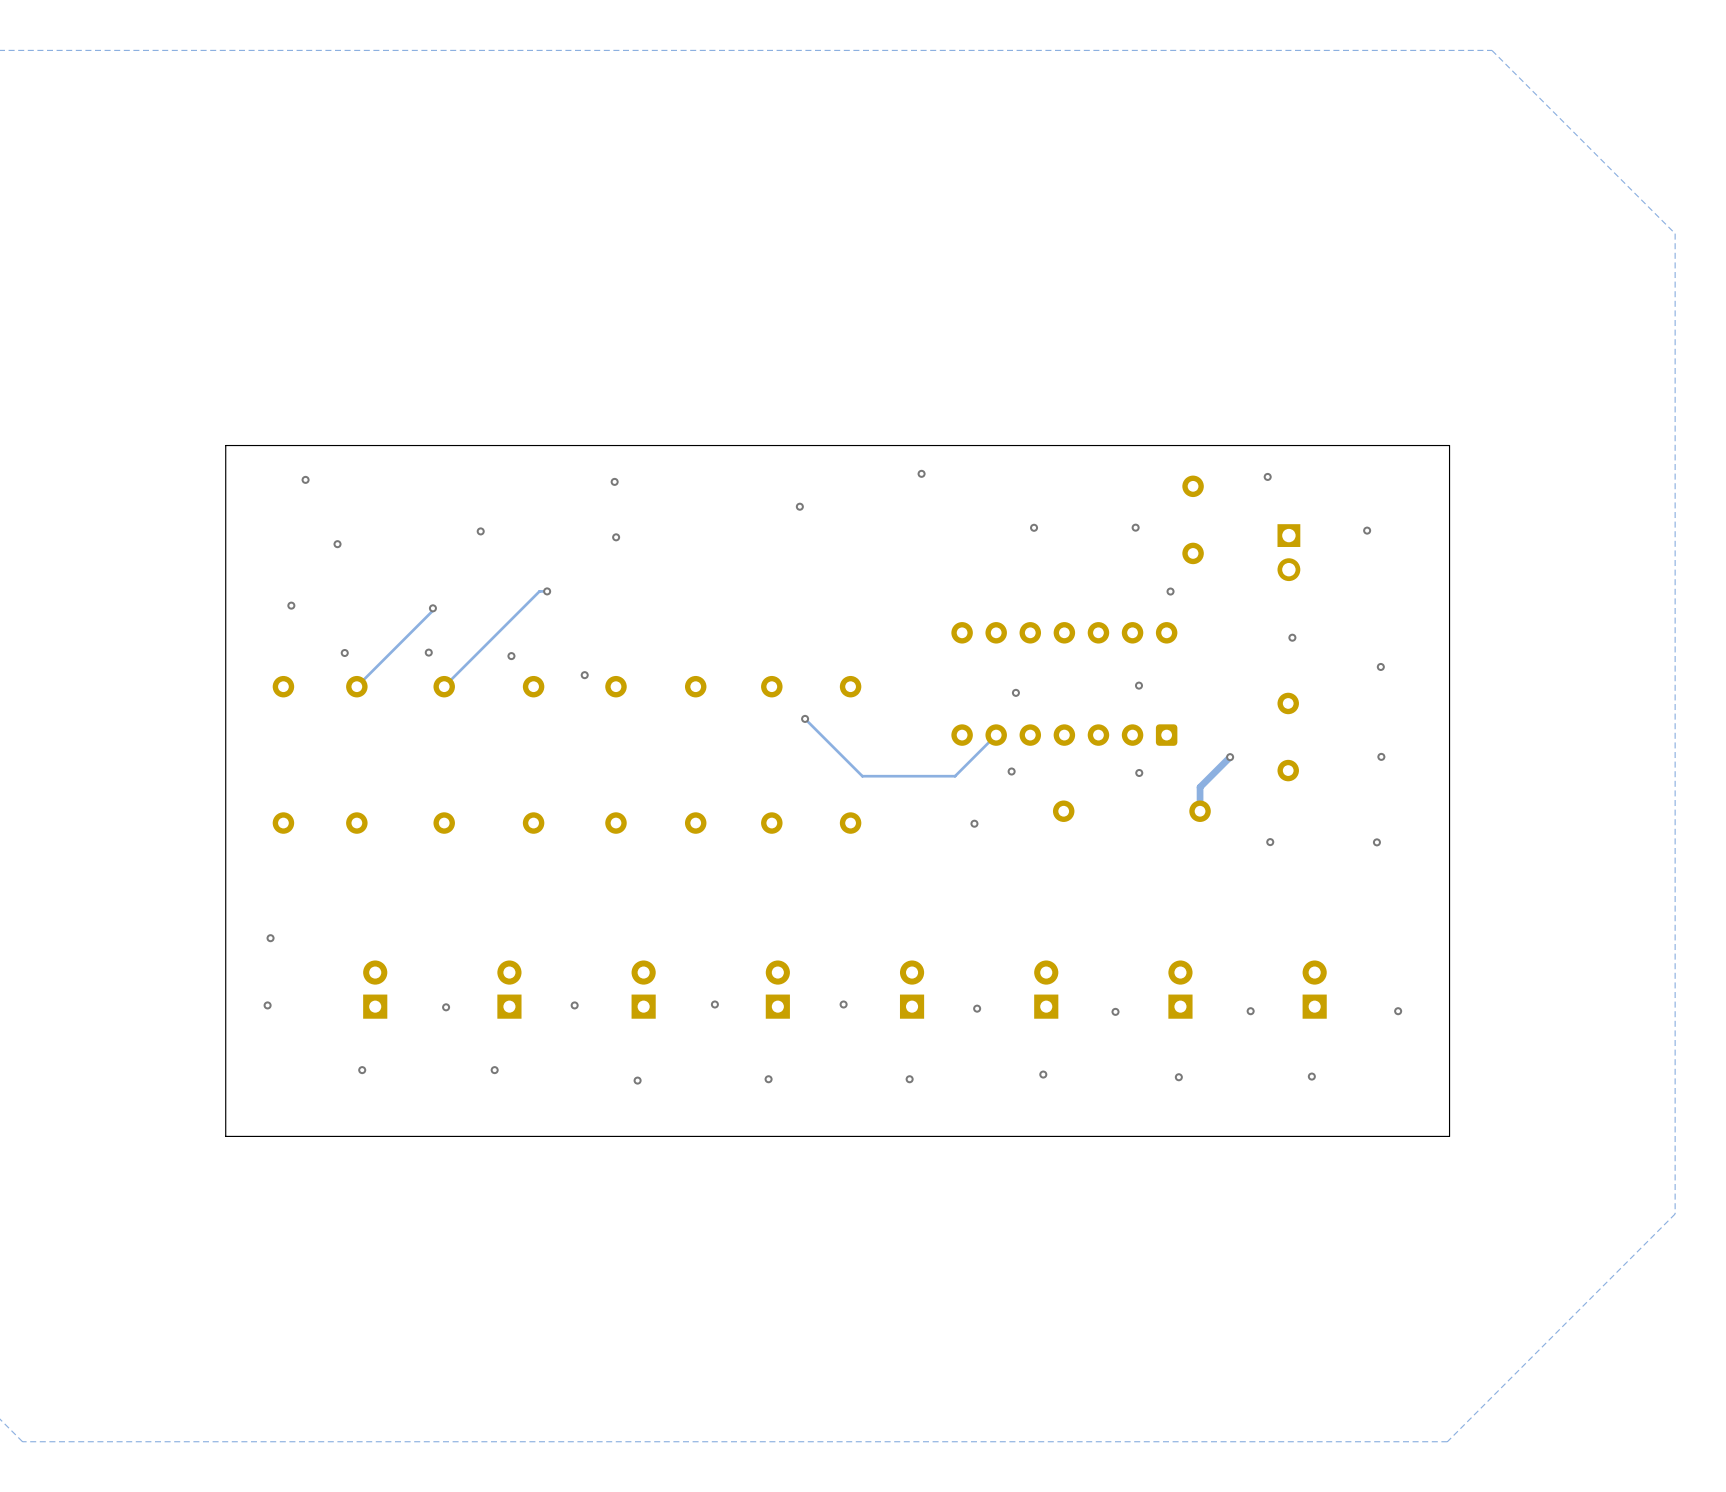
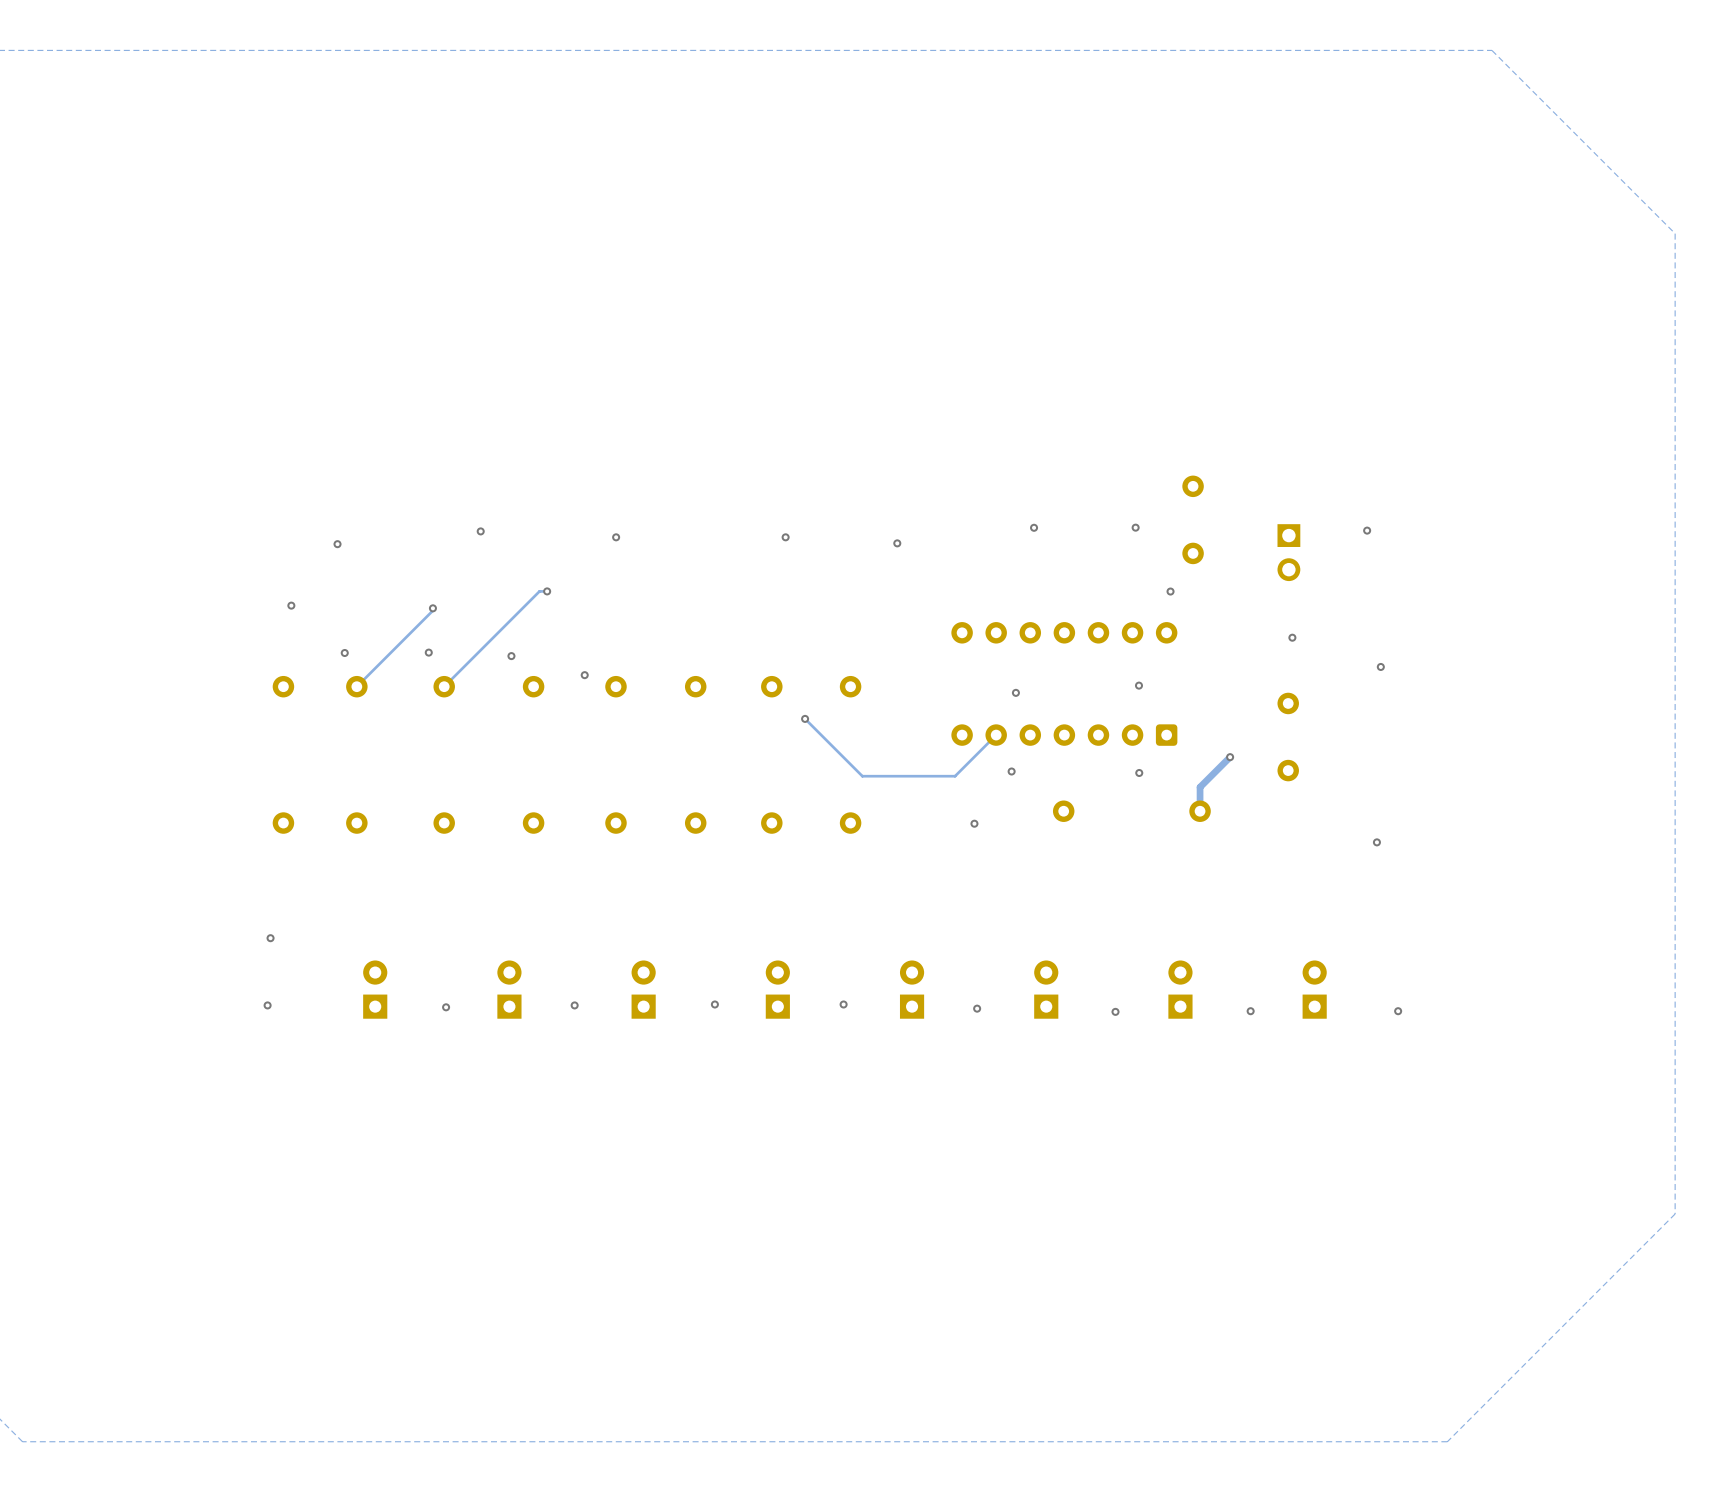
board edge: (1449, 445) (225, 445) (225, 1136) (1449, 1136) (1449, 445) -> none
via: (921, 473) -> none
via: (1267, 476) -> none
via: (305, 479) -> none
via: (614, 481) -> none
via position: (799, 506) -> (785, 537)
via: none -> (897, 543)
via: (1381, 756) -> none
via: (1270, 842) -> none
via: (362, 1070) -> none
via: (494, 1070) -> none
via: (1043, 1074) -> none
via: (1311, 1076) -> none
via: (1178, 1077) -> none
via: (768, 1079) -> none
via: (909, 1079) -> none
via: (637, 1080) -> none

